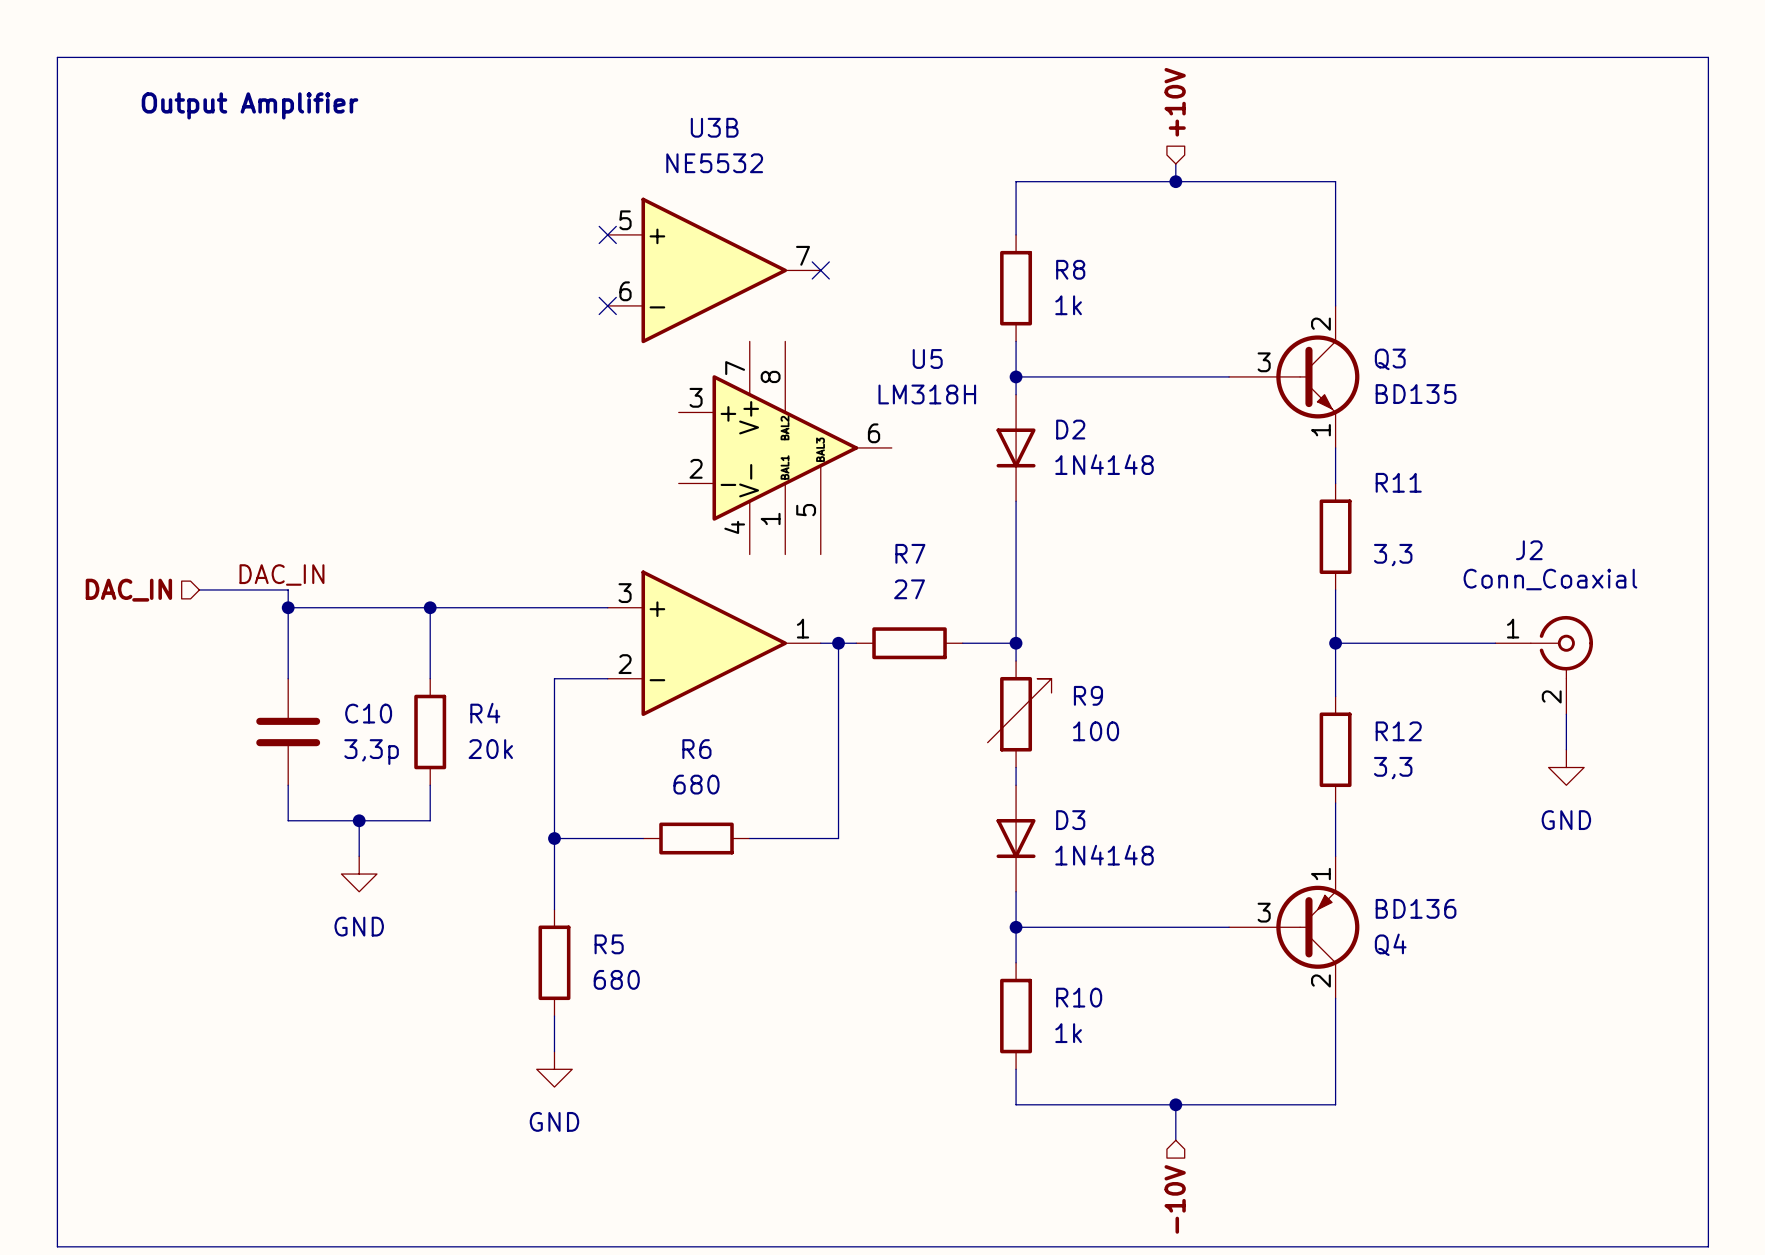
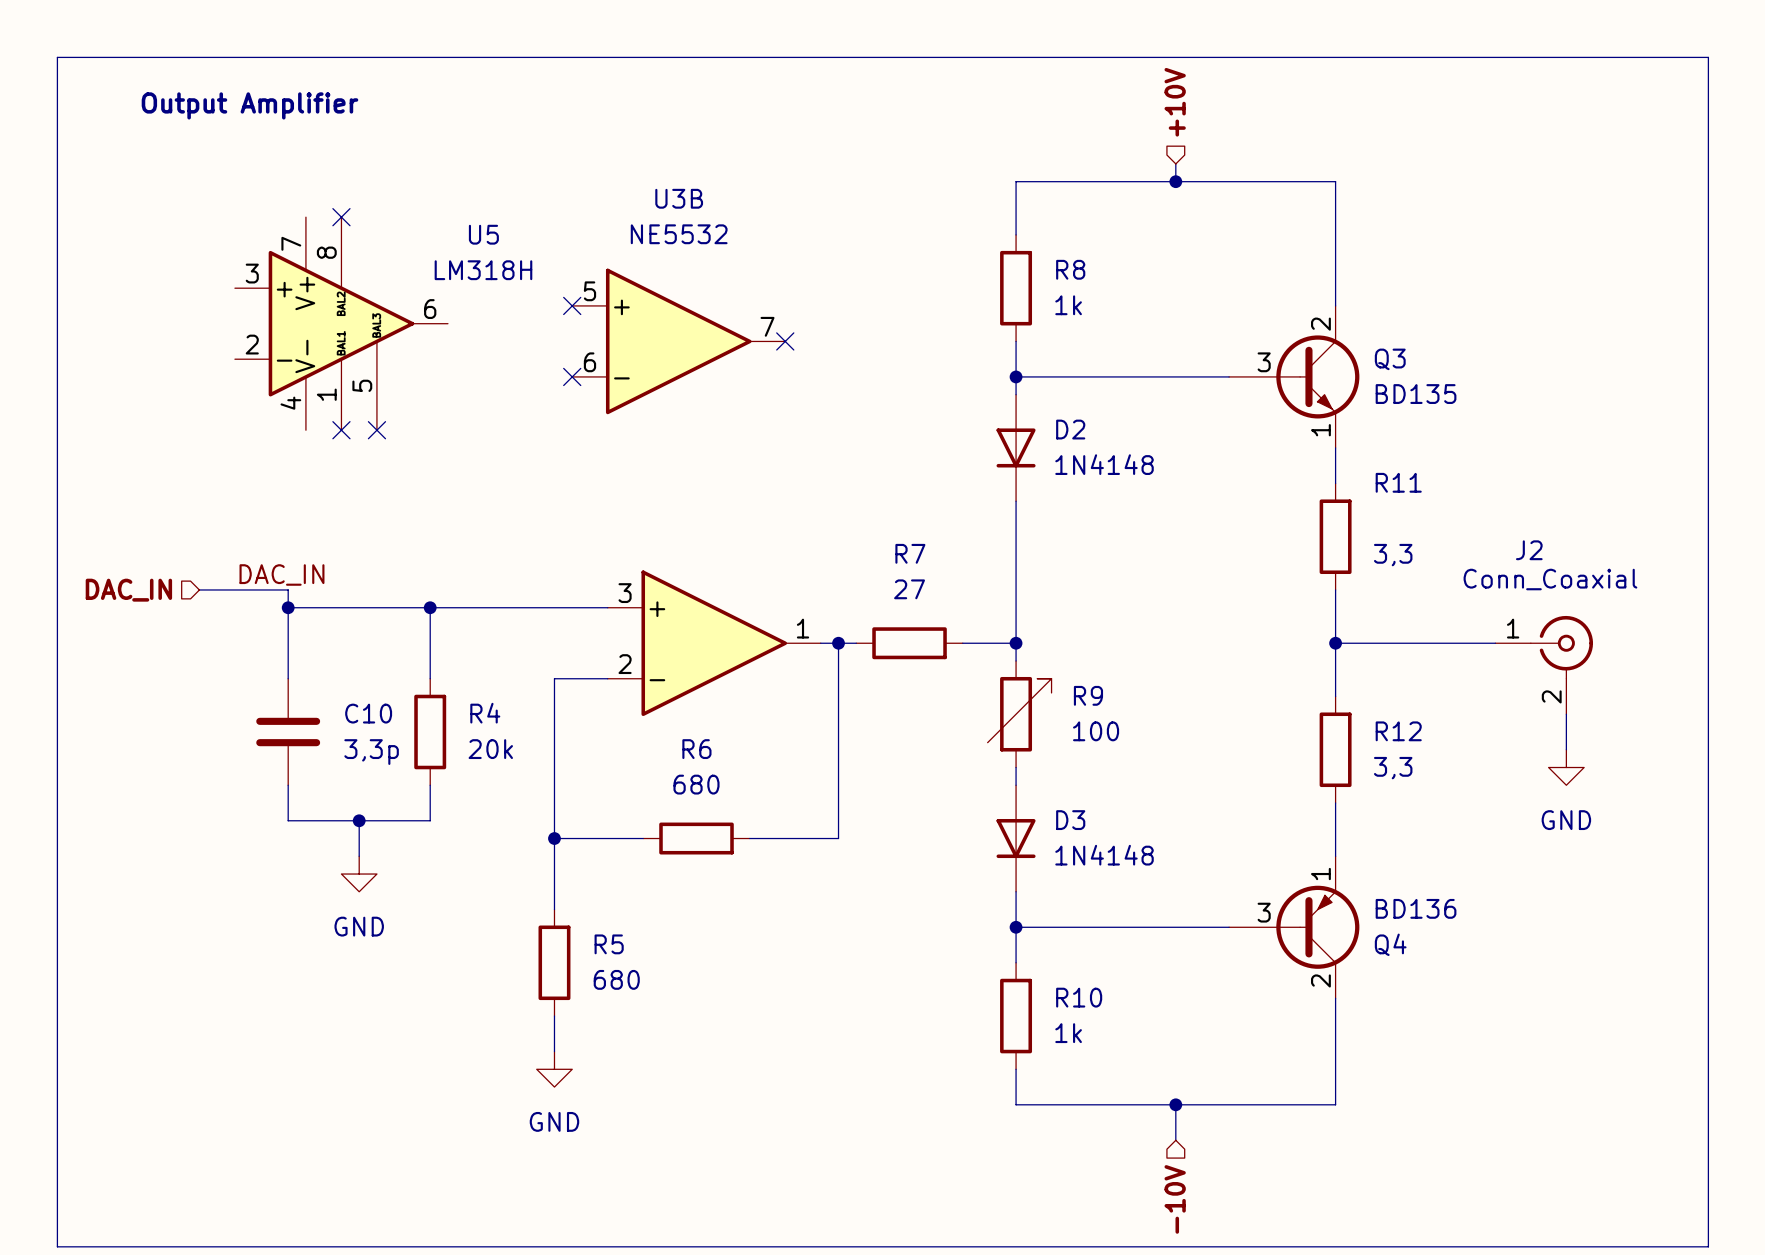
no-connect mark: none -> (341, 217)
no-connect mark: (607, 234) -> none
U3B position: (714, 270) -> (678, 341)
no-connect mark position: (820, 270) -> (785, 341)
no-connect mark position: (607, 305) -> (572, 305)
no-connect mark: none -> (572, 376)
no-connect mark: none -> (341, 430)
no-connect mark: none -> (376, 430)
U5 position: (785, 447) -> (341, 323)

